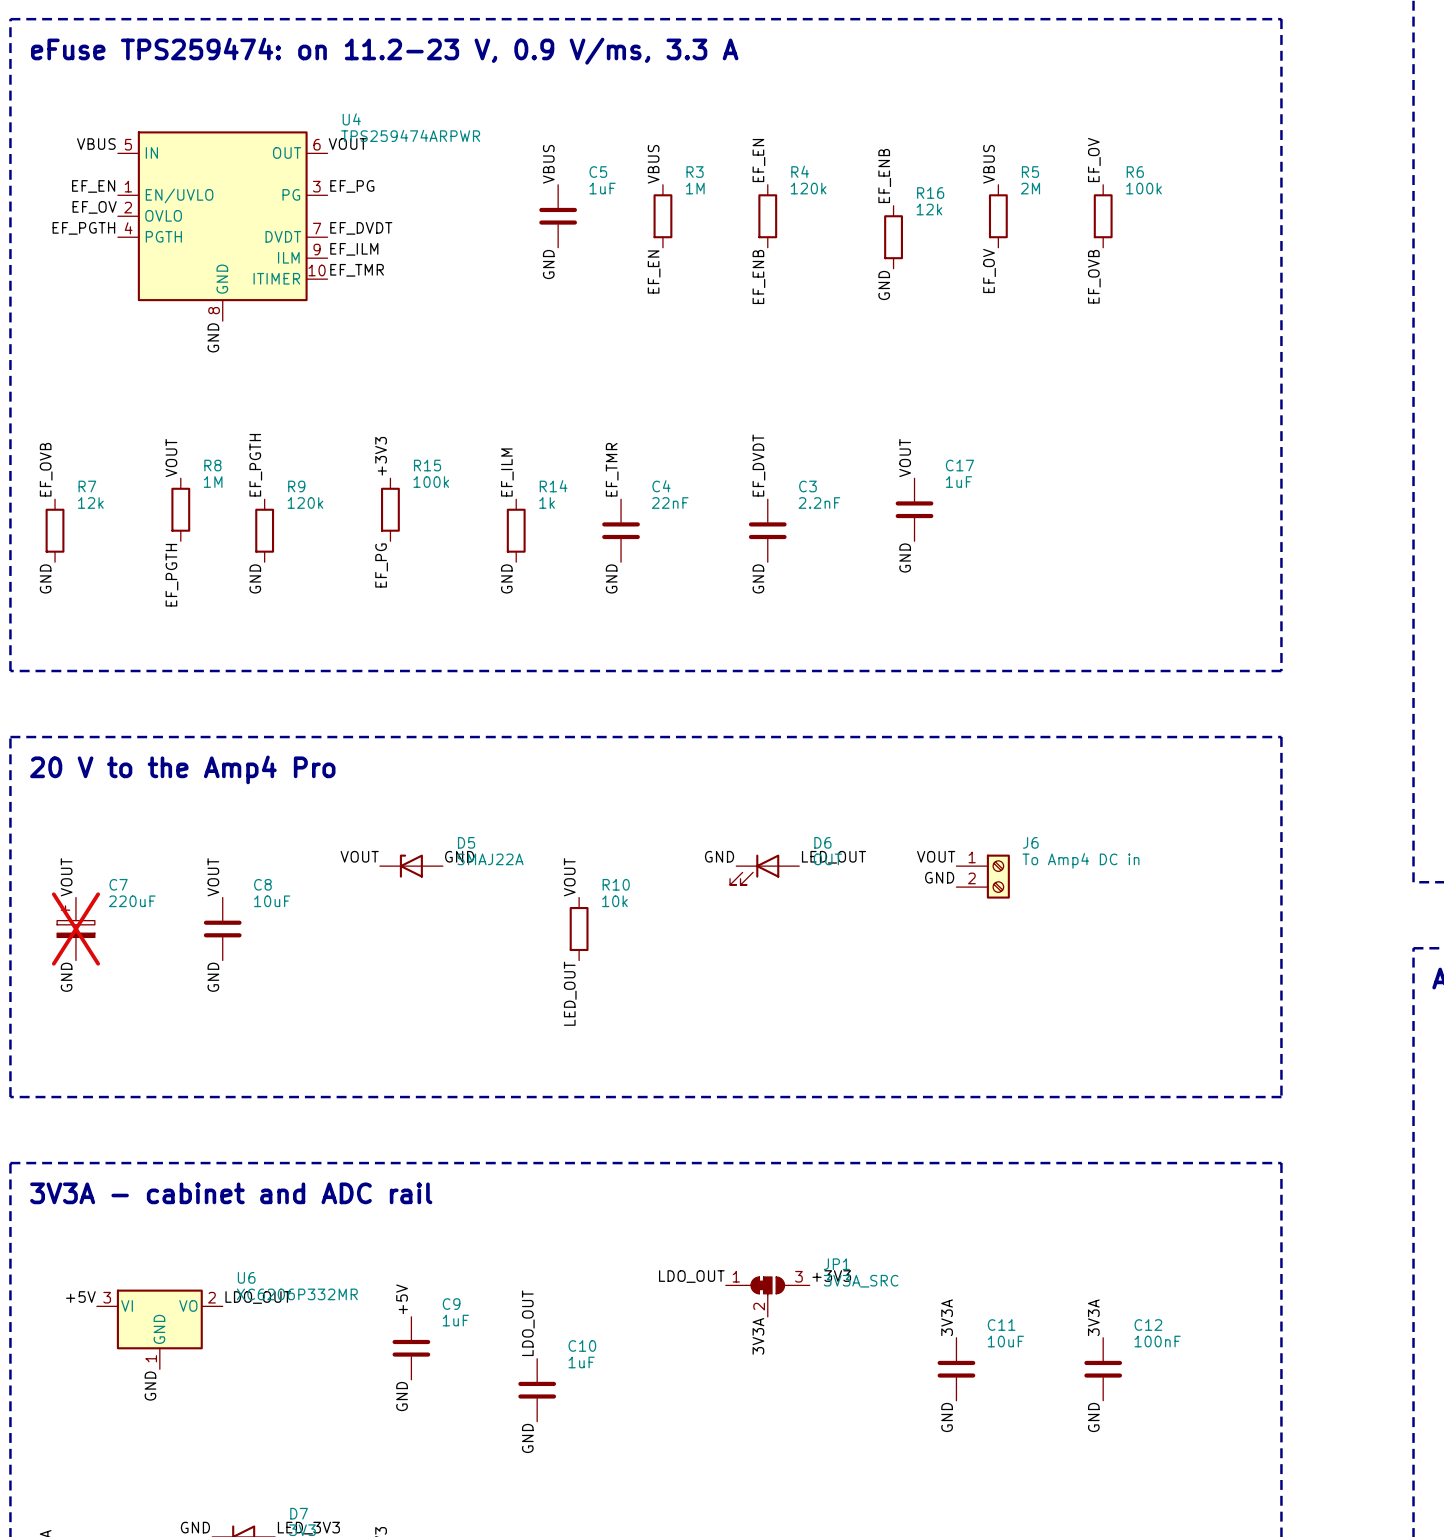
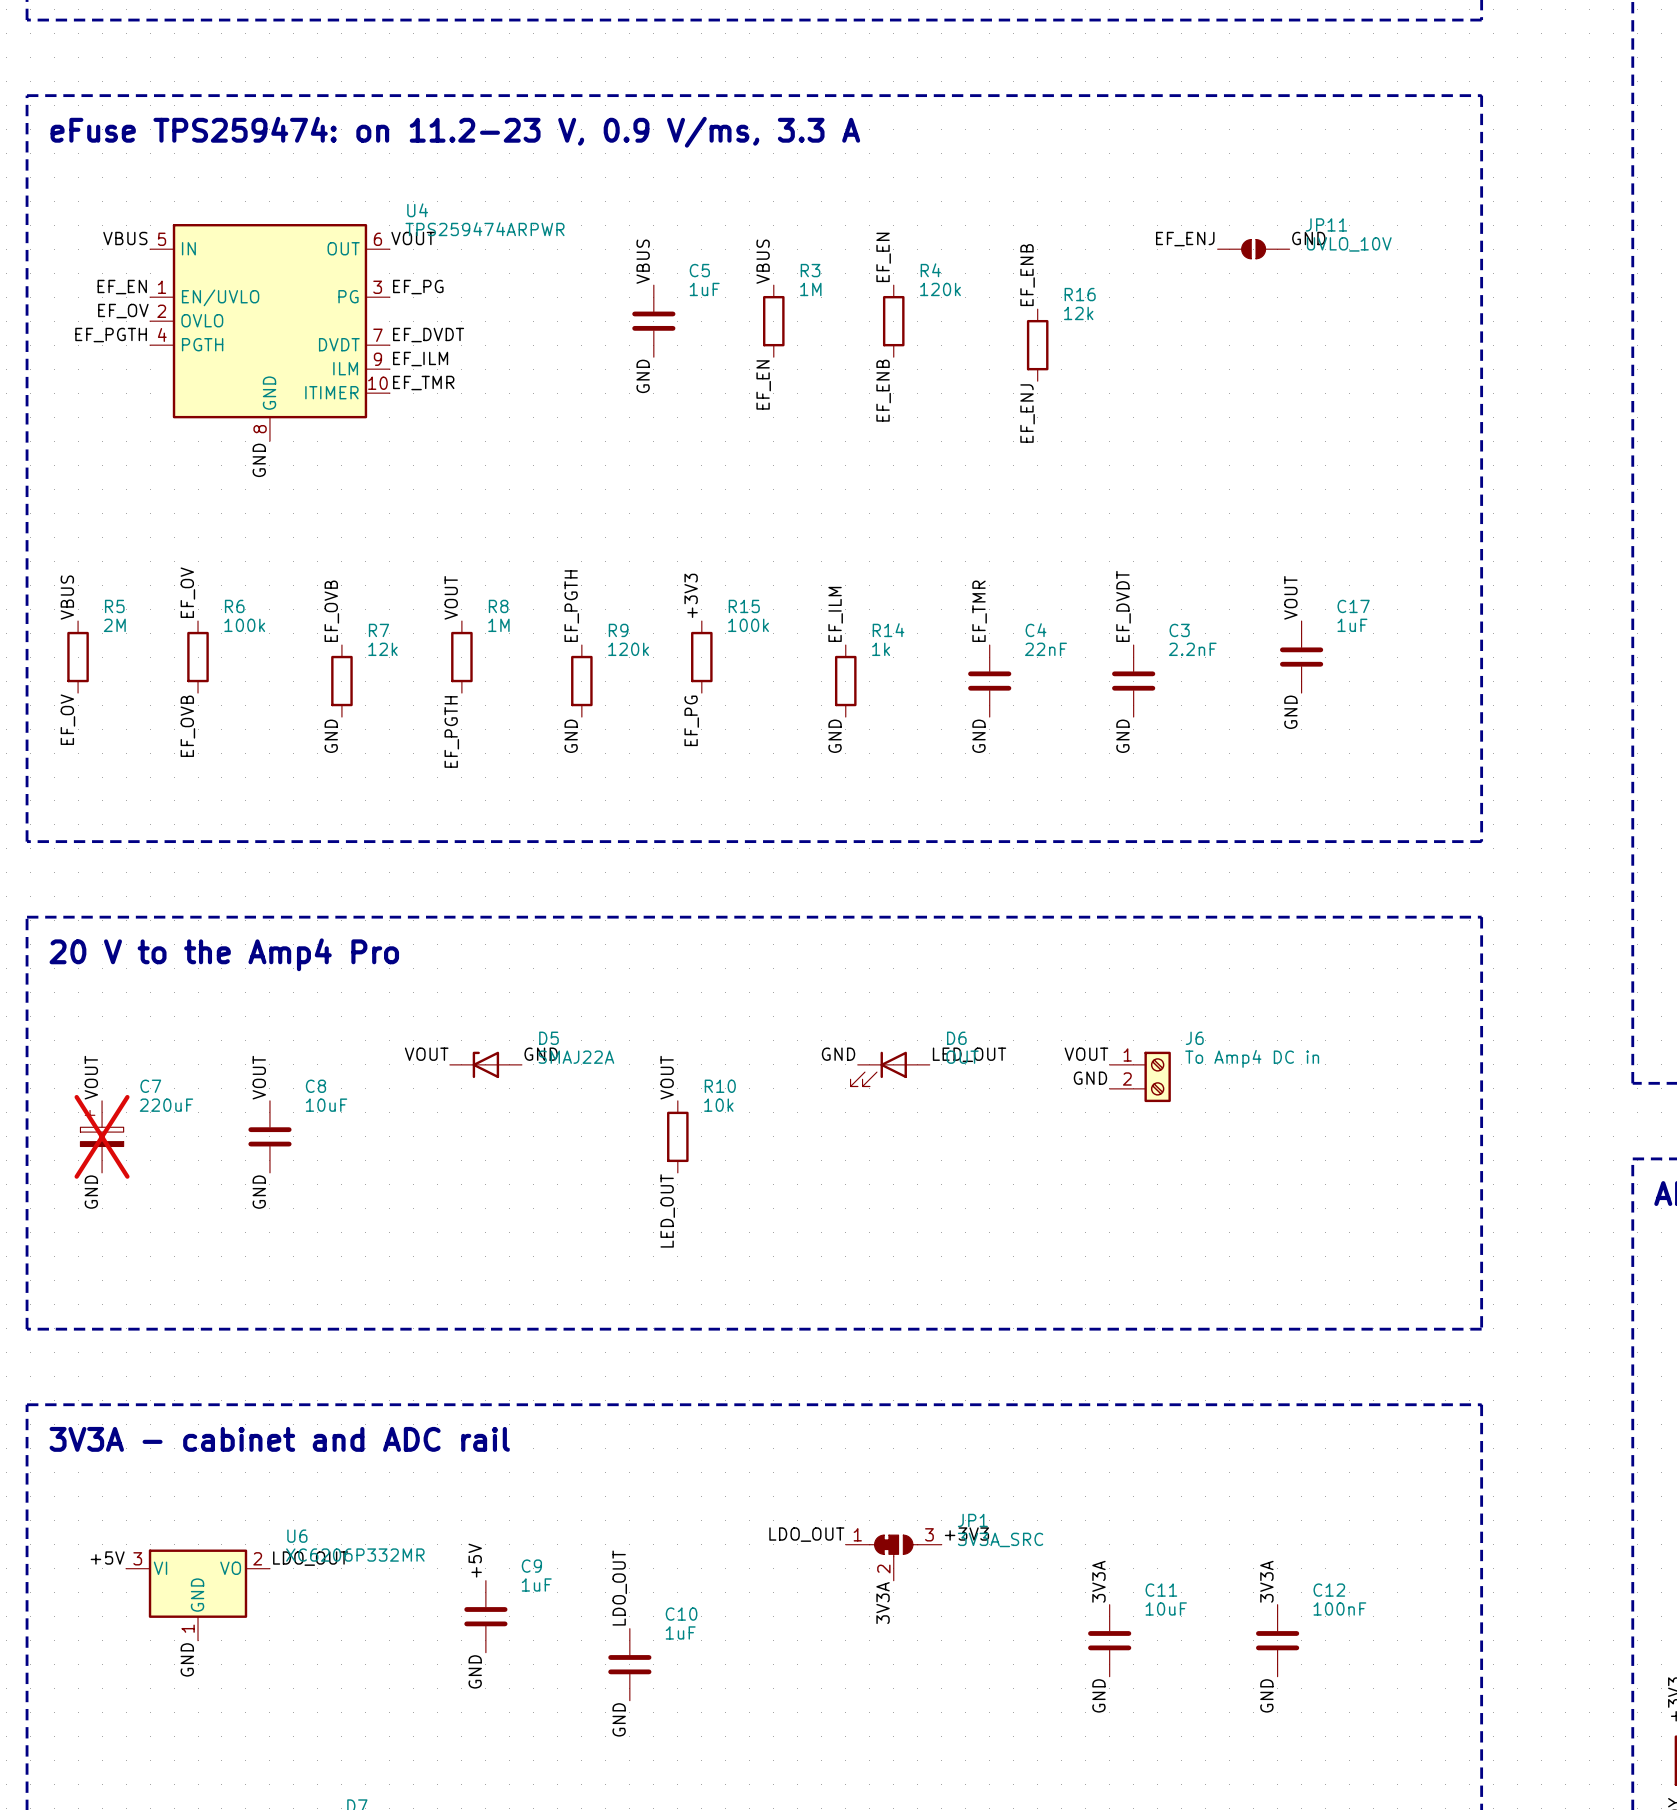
label: none -> EF_ENJ (1185, 239)
label: none -> GND (1308, 238)
JP11: none -> UVLO_10V (1253, 249)
label: EF_OV (1094, 160) -> none
label: VBUS (989, 164) -> none
R5 position: (998, 216) -> (78, 657)
R6 position: (1103, 216) -> (198, 657)
label: EF_OV (989, 270) -> none
label: EF_OVB (1094, 276) -> none
label: GND (884, 285) -> EF_ENJ (1027, 413)
label: none -> EF_OV (187, 592)
label: +3V3 (381, 456) -> VOUT (451, 597)
label: none -> +3V3 (691, 595)
label: none -> VBUS (67, 597)
label: VOUT (171, 458) -> none
label: VOUT (905, 458) -> none
label: none -> VOUT (1290, 597)
label: EF_PGTH (255, 465) -> none
R15 name: R15 (427, 465) -> R8 (498, 606)
label: none -> EF_PGTH (571, 606)
label: EF_DVDT (758, 465) -> none
label: none -> EF_DVDT (1123, 606)
label position: EF_OVB (46, 469) -> EF_OVB (187, 726)
label: none -> EF_OVB (331, 611)
label: EF_TMR (612, 469) -> none
label: none -> EF_TMR (979, 611)
label: EF_ILM (507, 472) -> none
label: none -> EF_ILM (835, 614)
R15 value: 100k (431, 482) -> 1M (498, 625)
R8: 1M (180, 509) -> none
R15: none -> 100k (701, 657)
C17 position: (914, 509) -> (1301, 657)
R7 position: (55, 530) -> (341, 681)
R9 position: (264, 530) -> (581, 681)
R14 position: (516, 530) -> (845, 681)
C4 position: (621, 530) -> (989, 681)
C3 position: (767, 530) -> (1133, 681)
label: GND (905, 557) -> none
label: none -> GND (1290, 712)
label: none -> EF_OV (67, 719)
label: EF_PG (381, 565) -> EF_PGTH (451, 731)
label: none -> EF_PG (691, 720)
label: EF_PGTH (171, 575) -> none
label: GND (45, 578) -> none
label position: GND (255, 578) -> GND (331, 736)
label position: GND (506, 578) -> GND (571, 736)
label: GND (611, 578) -> none
label: none -> GND (835, 736)
label: GND (758, 578) -> none
label: none -> GND (979, 736)
label: none -> GND (1122, 736)

